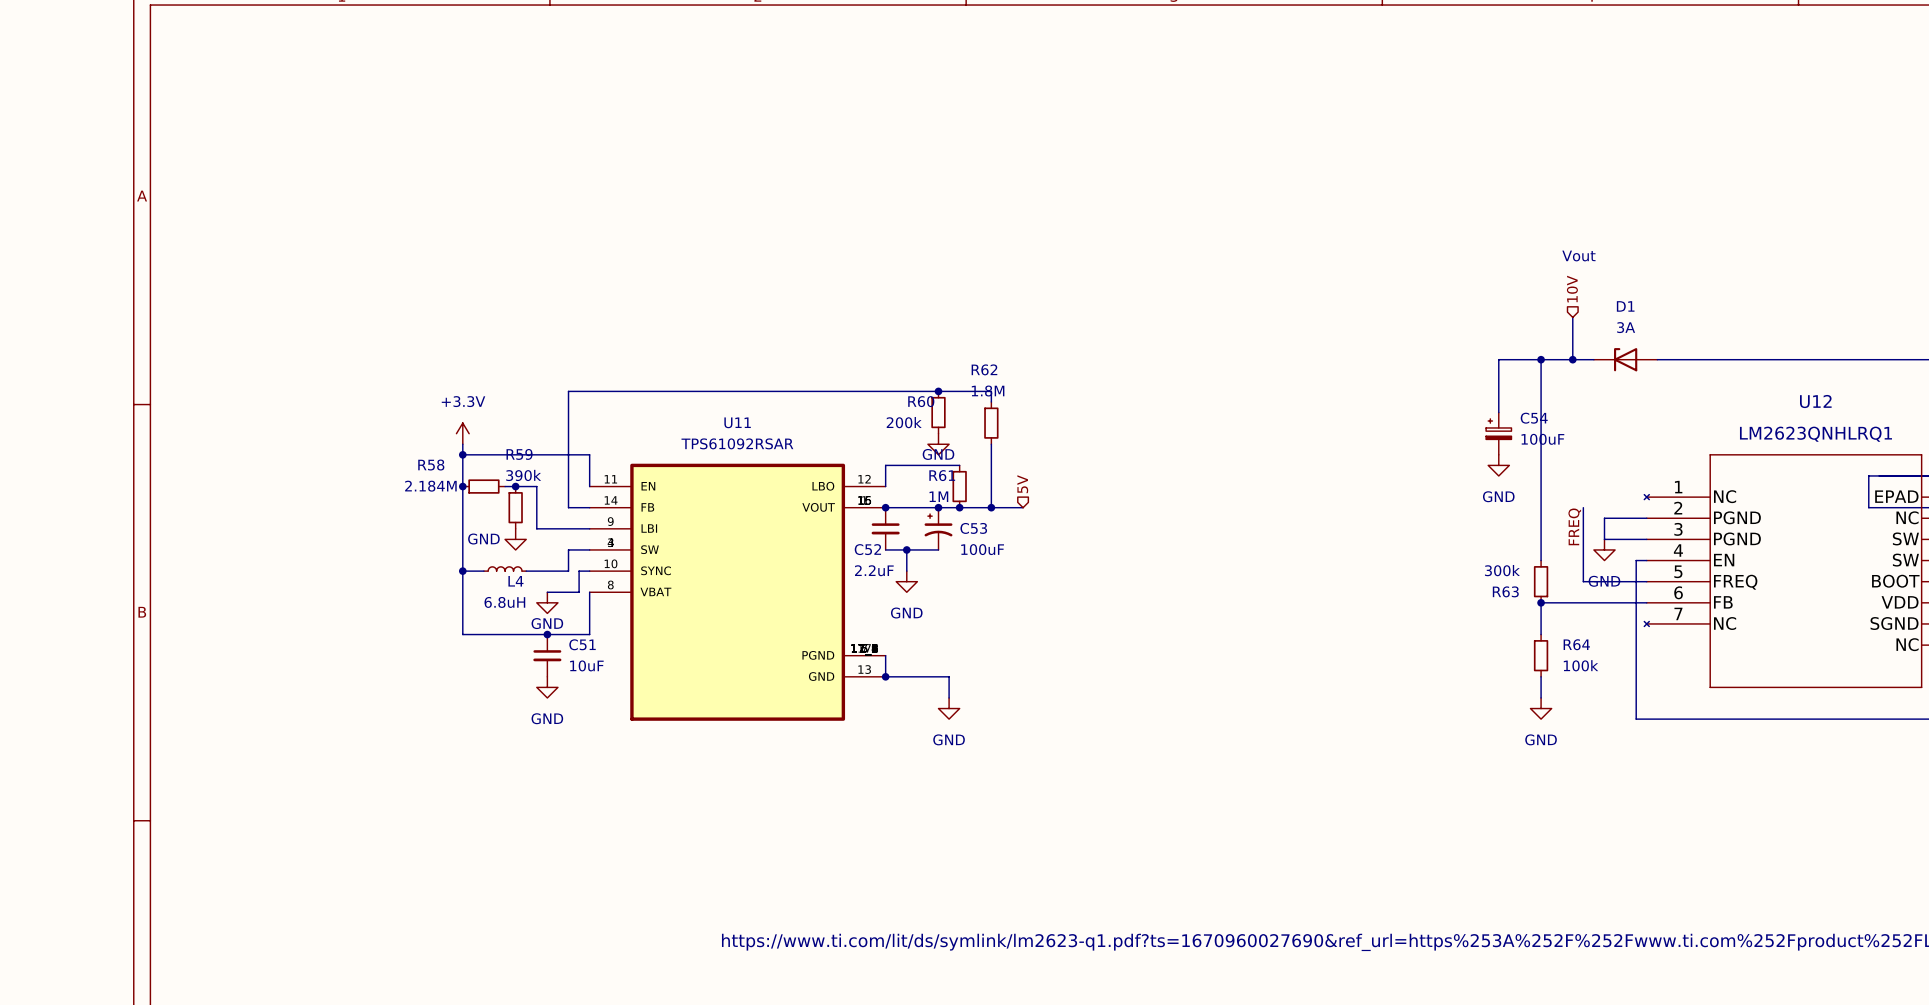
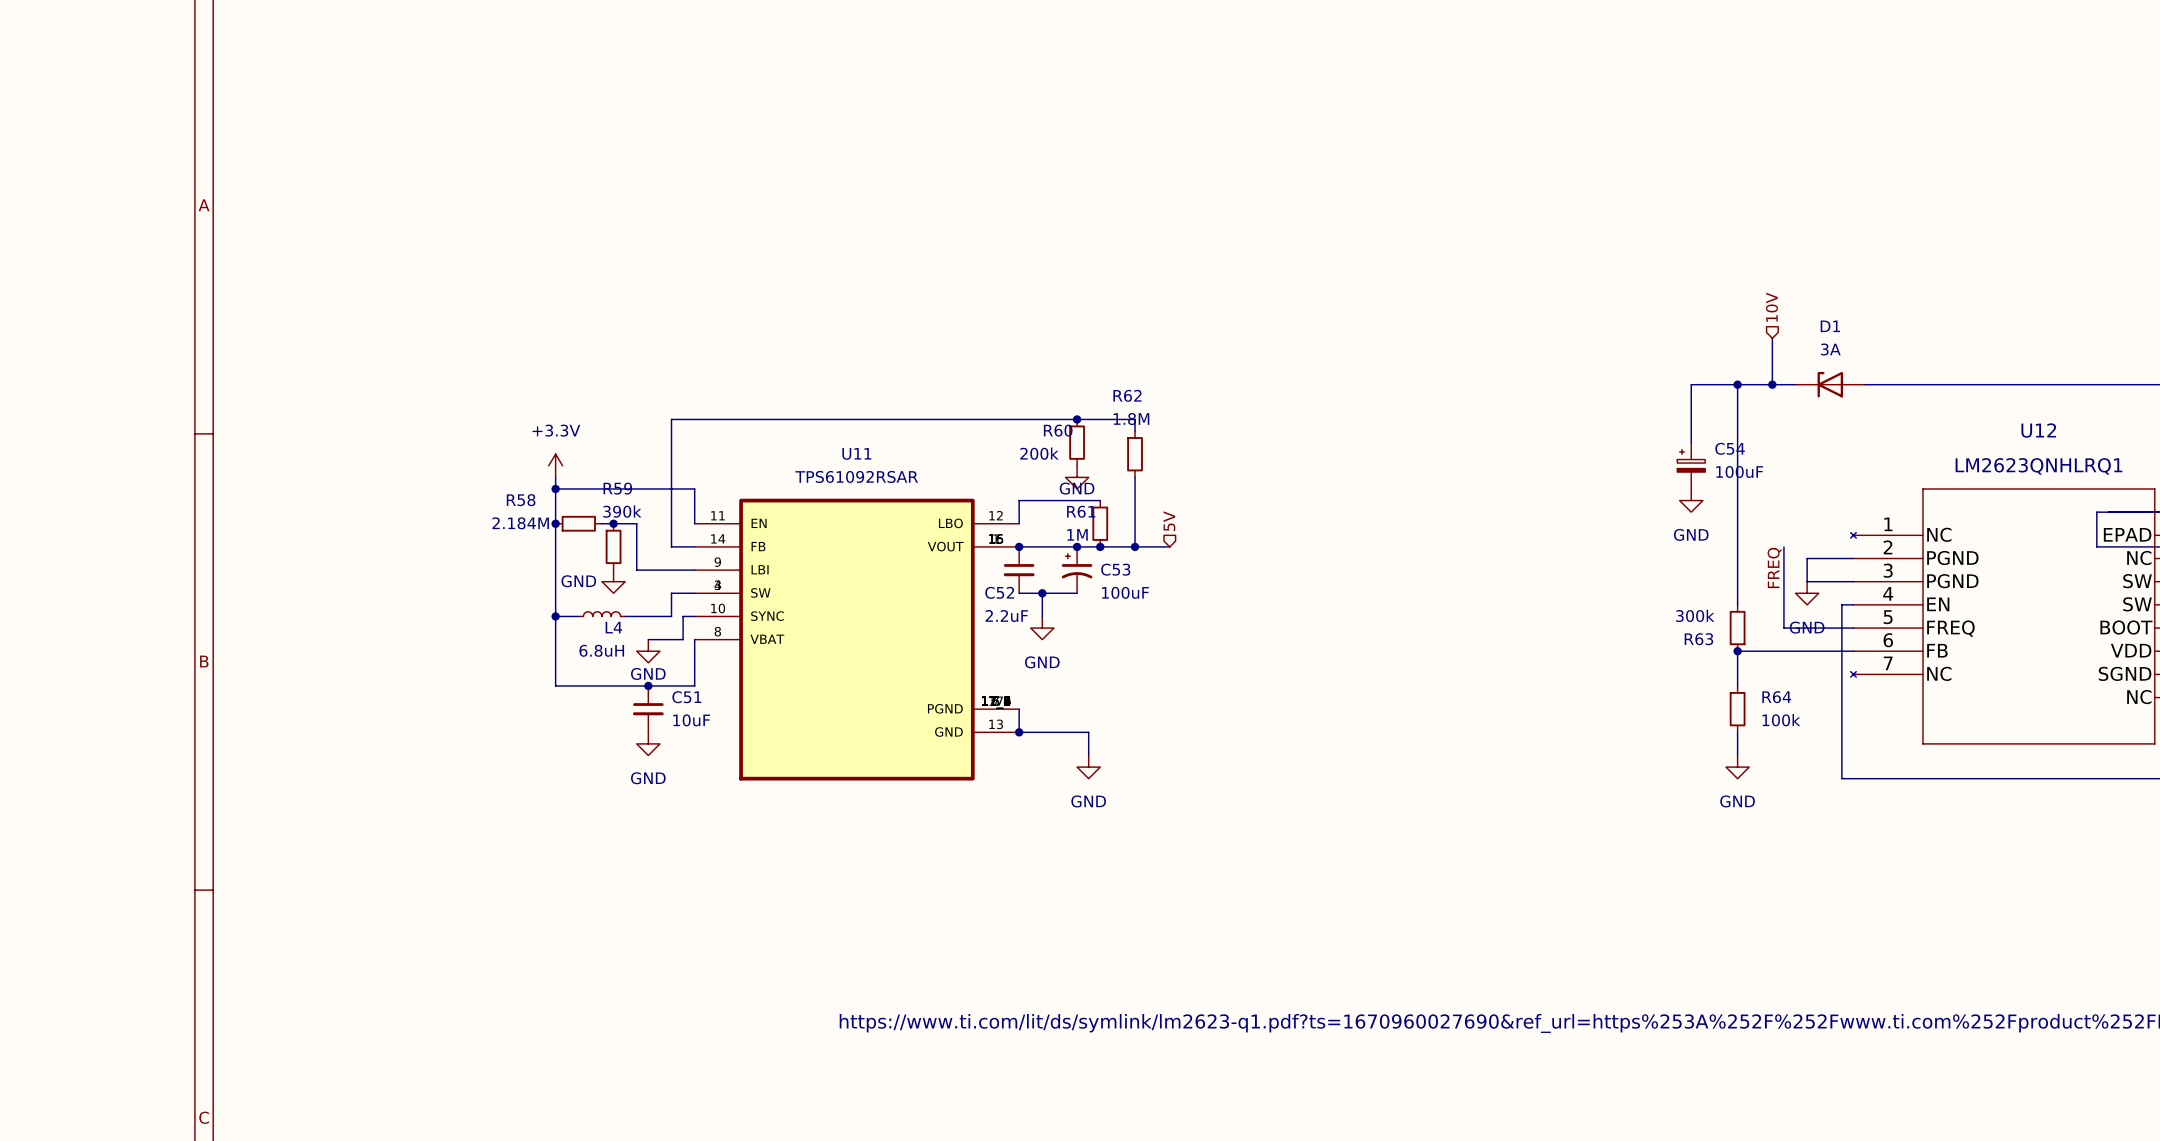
text: Vout (1578, 255) -> none

